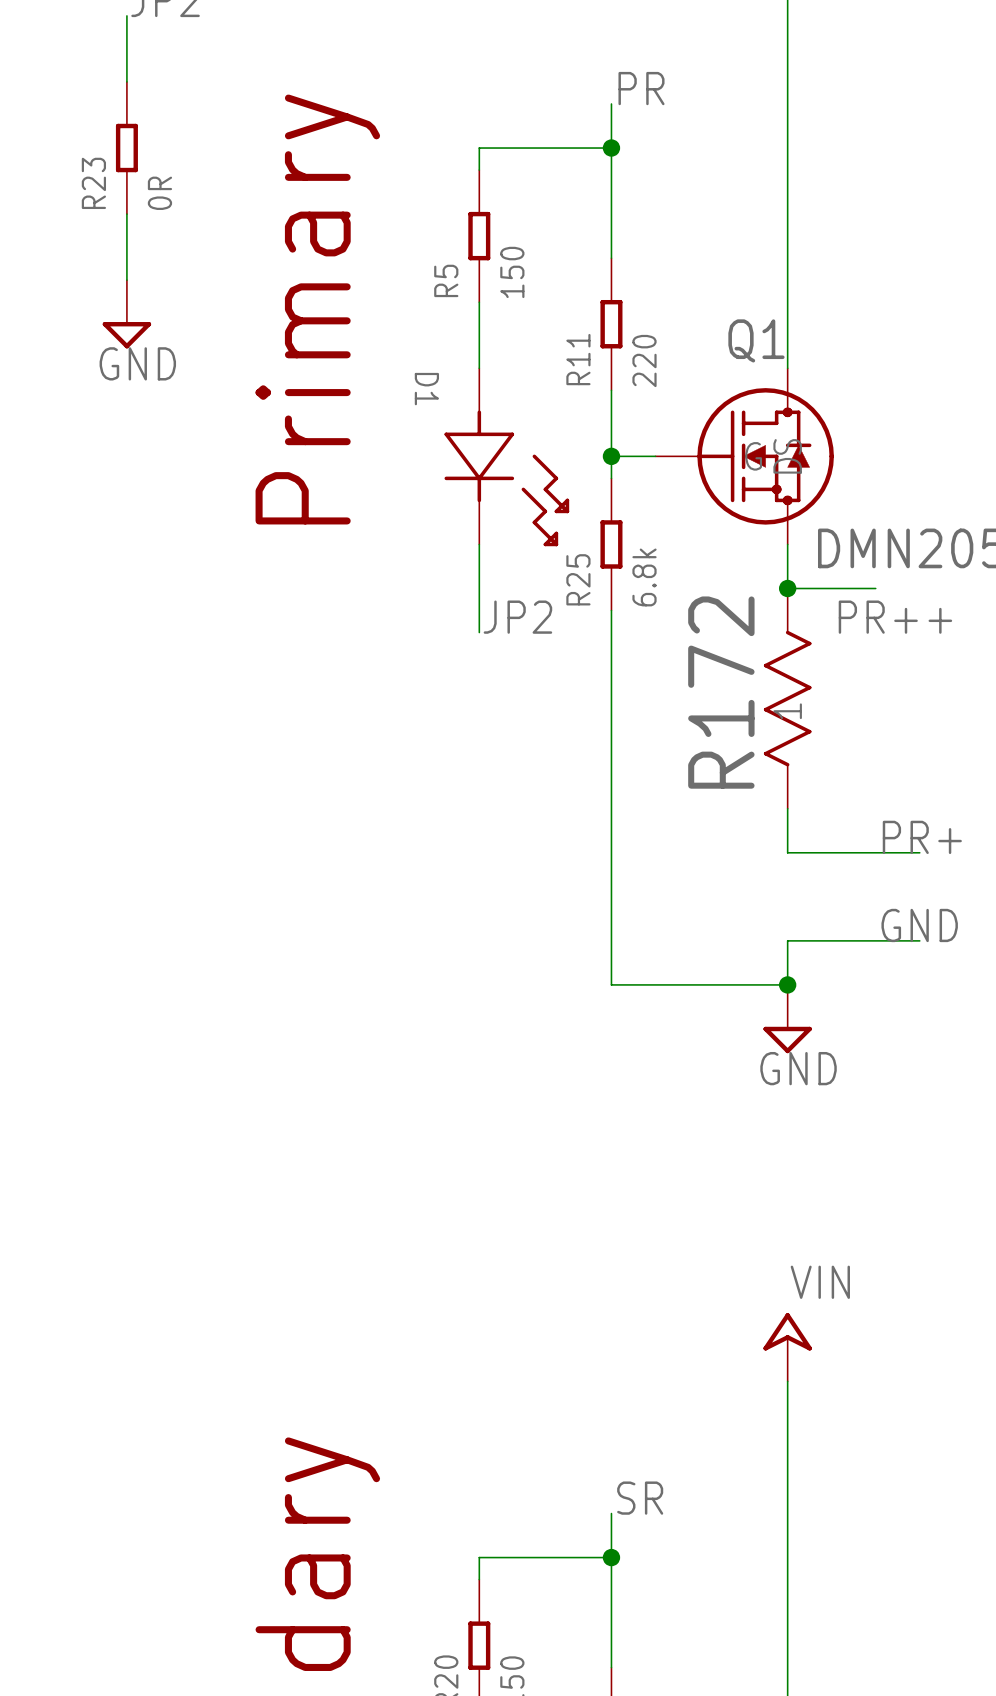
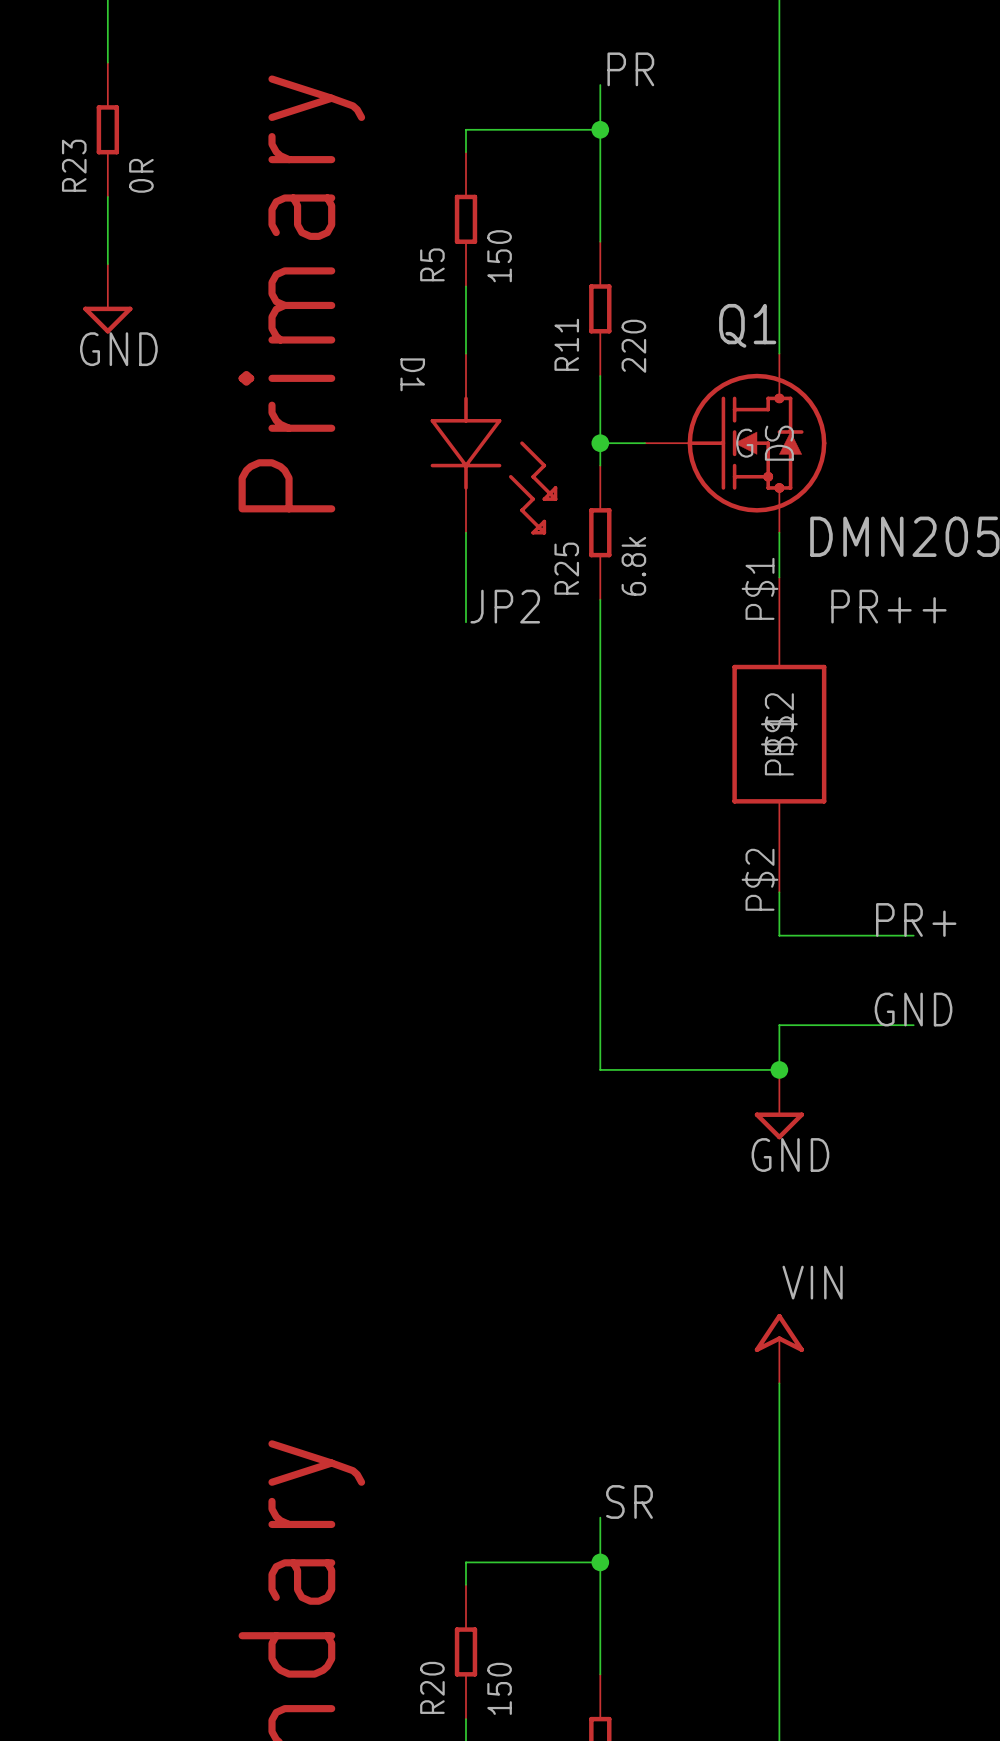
wire: (787, 588) (875, 588) -> none
junction: (787, 588) -> none
R172: (787, 698) -> none
part: none -> (779, 734)
wire: (787, 808) (787, 852) (919, 852) -> none
label: PR+ (922, 837) -> none
wire: none -> (779, 892) (779, 935)
label: GND (919, 925) -> PR+ (916, 919)
wire: (787, 940) (787, 984) (611, 984) -> (913, 1025) (779, 1025) (779, 1069) (600, 1069) (600, 980)
junction position: (787, 984) -> (779, 1069)
label: none -> GND (913, 1009)
power symbol position: GND (787, 1019) -> GND (779, 1104)

